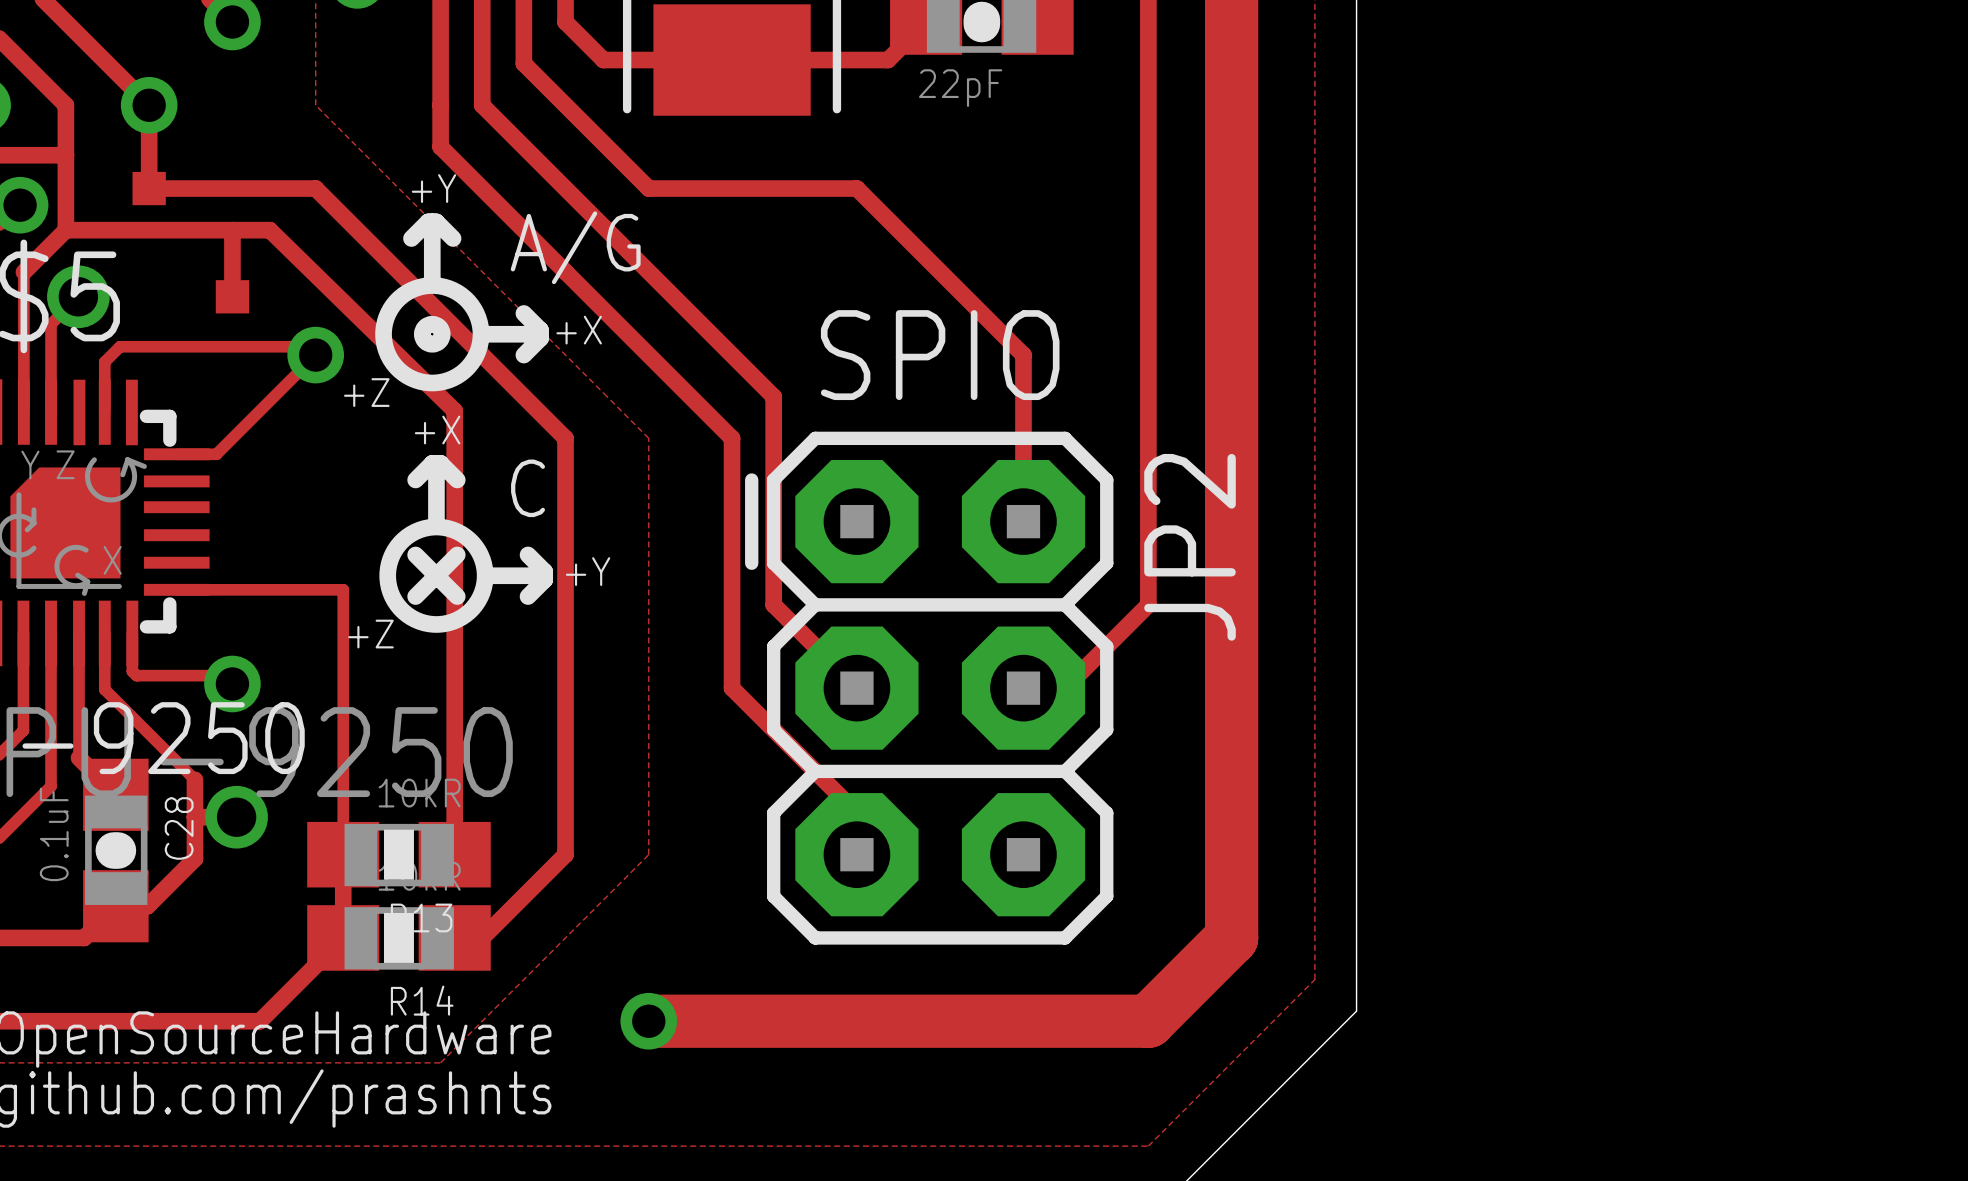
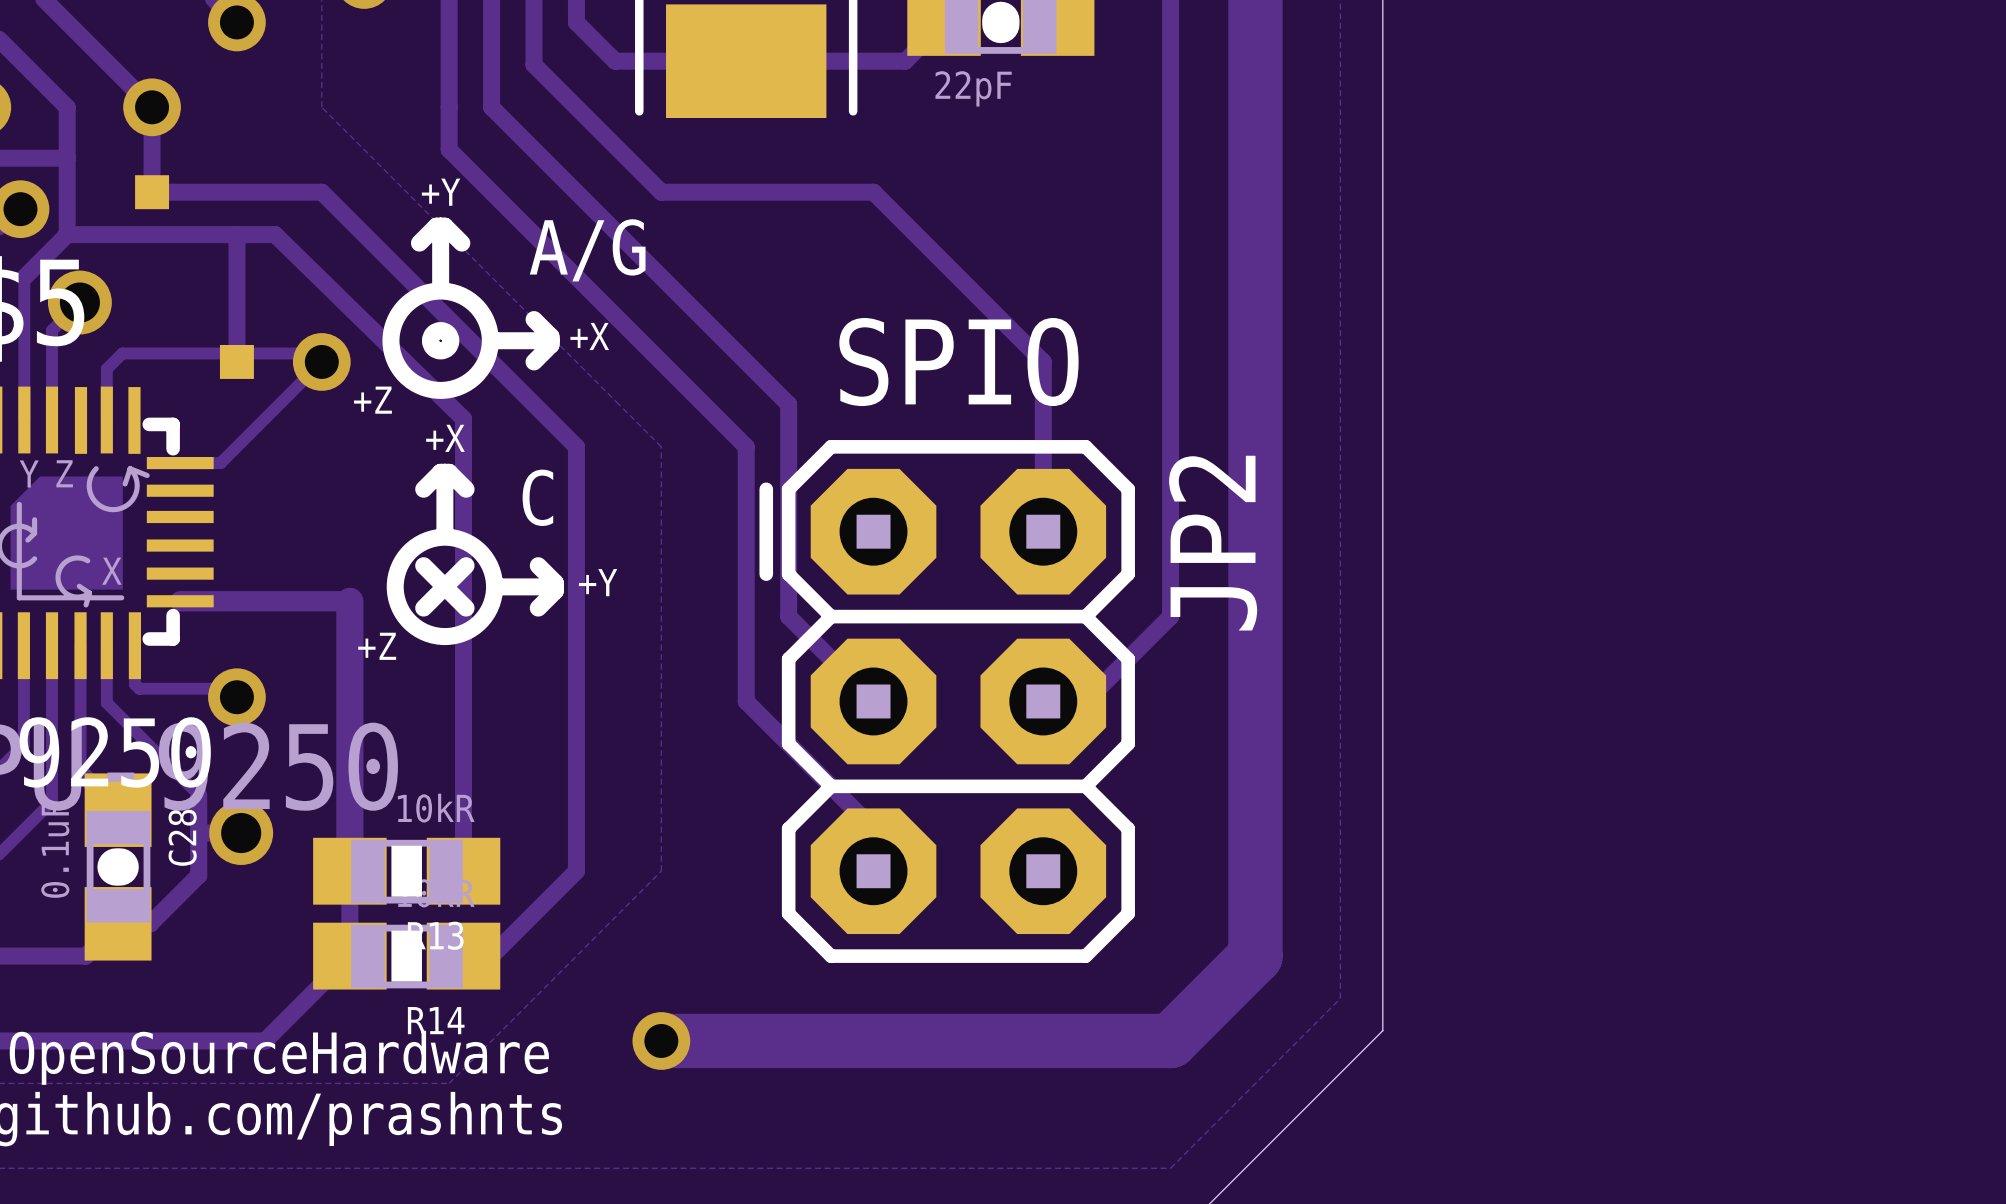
track: none -> (236, 302) (236, 361)
part position: (232, 296) -> (236, 361)
track width: thin (176, 589) (343, 589) (343, 854) -> thick (180, 601) (349, 601) (349, 871)

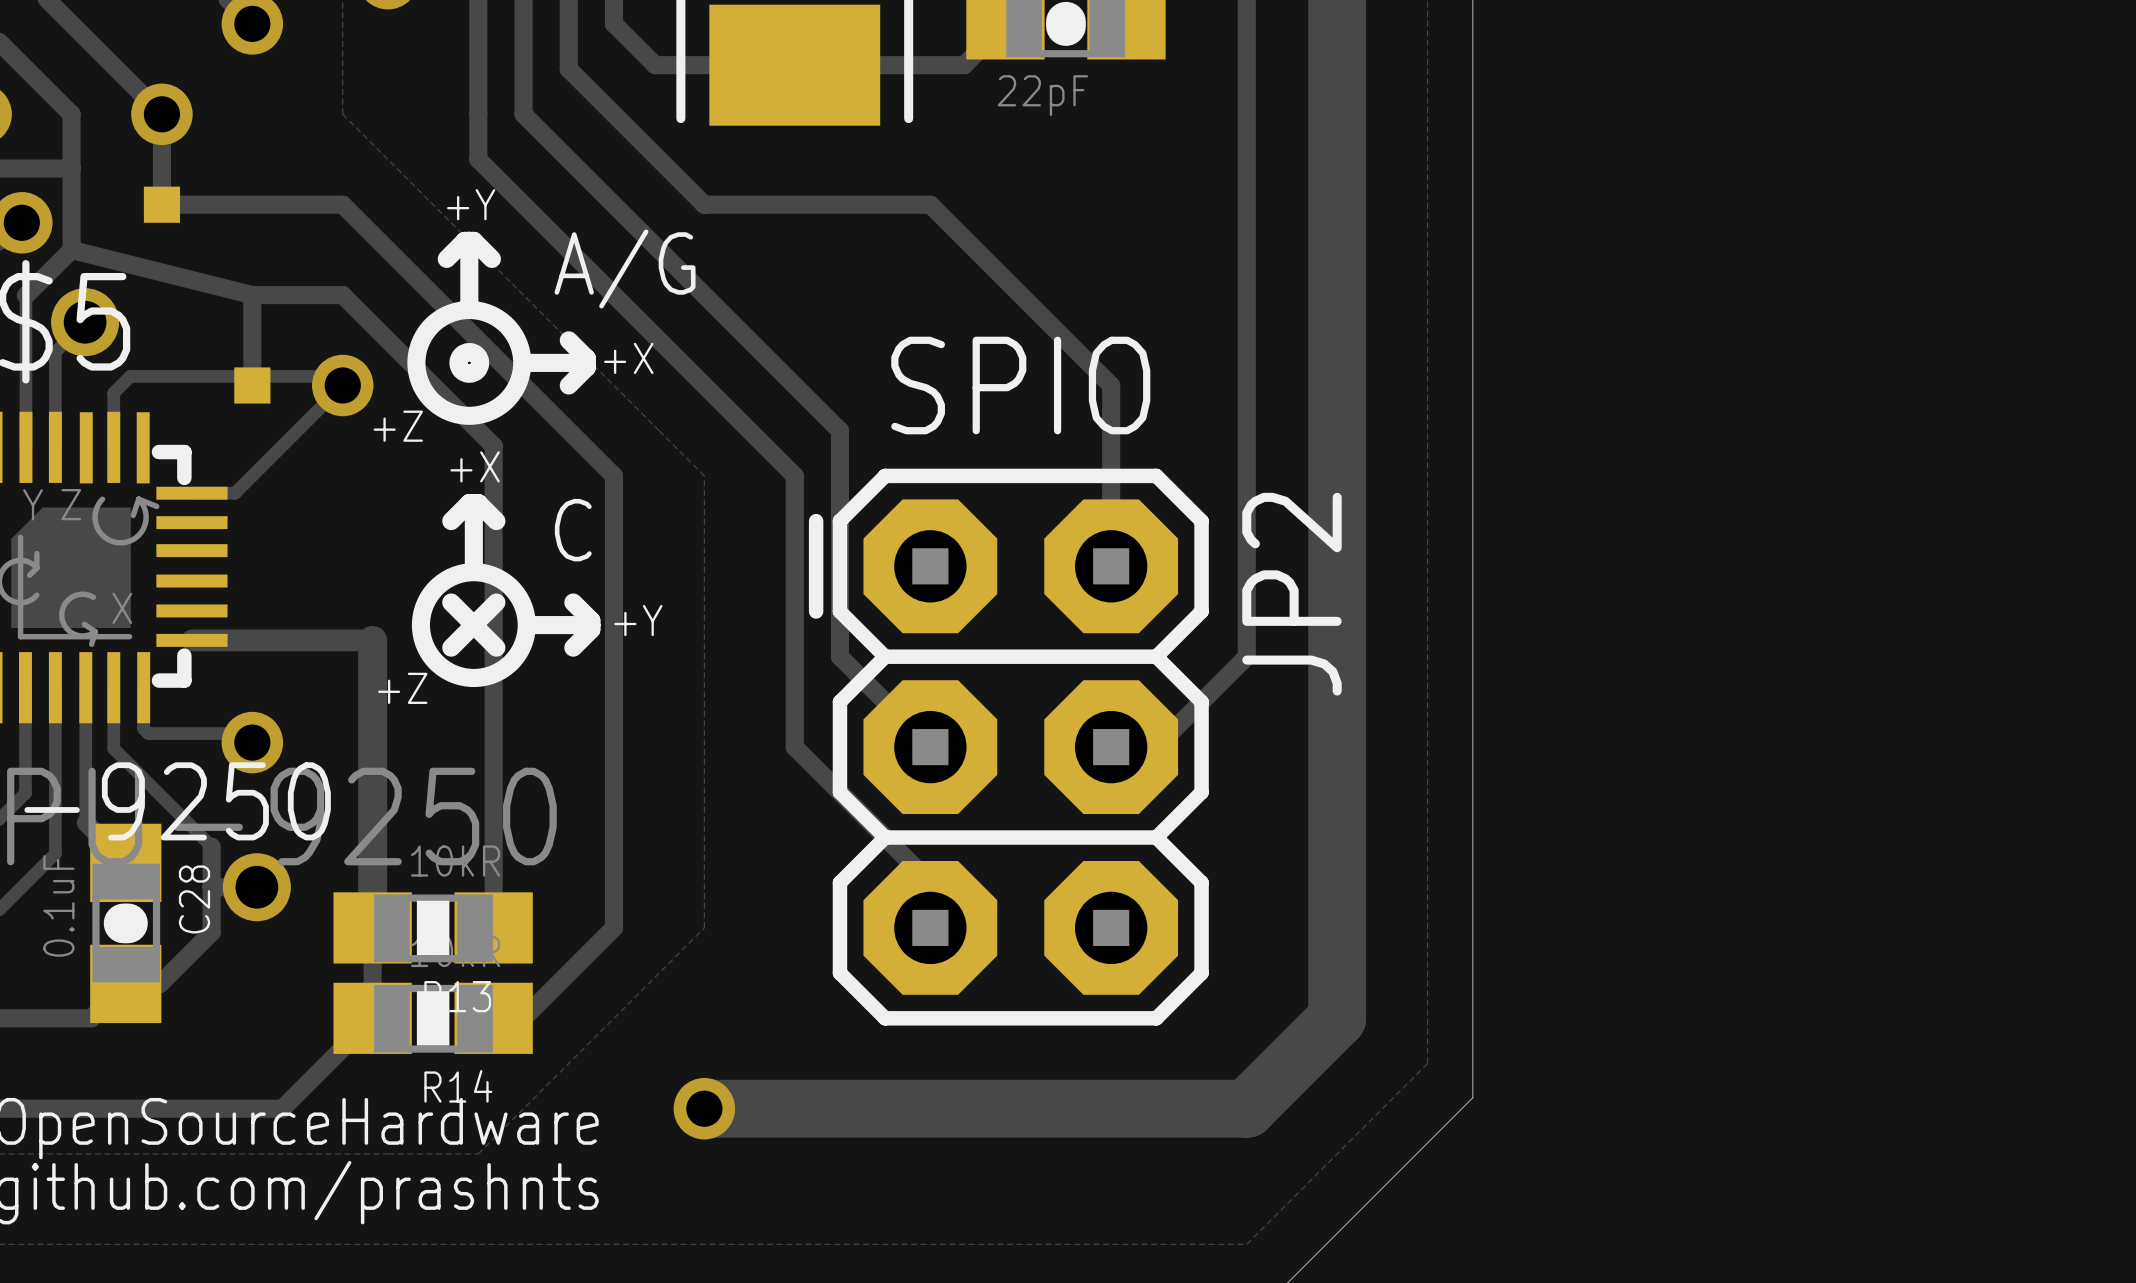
track: (67, 234) (275, 234) (463, 418) -> (71, 249) (252, 295) (342, 295) (493, 446)
track: (236, 234) (236, 277) -> none

